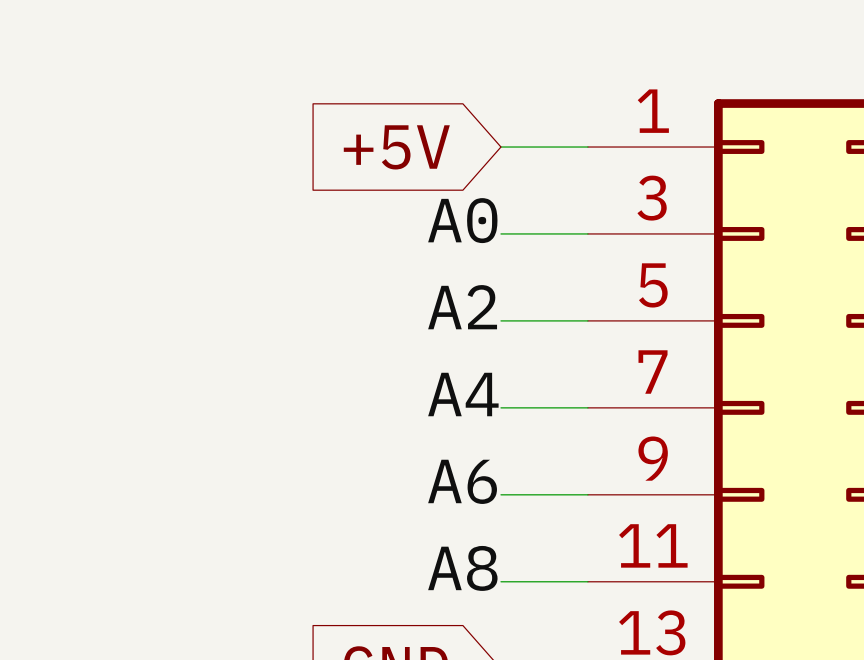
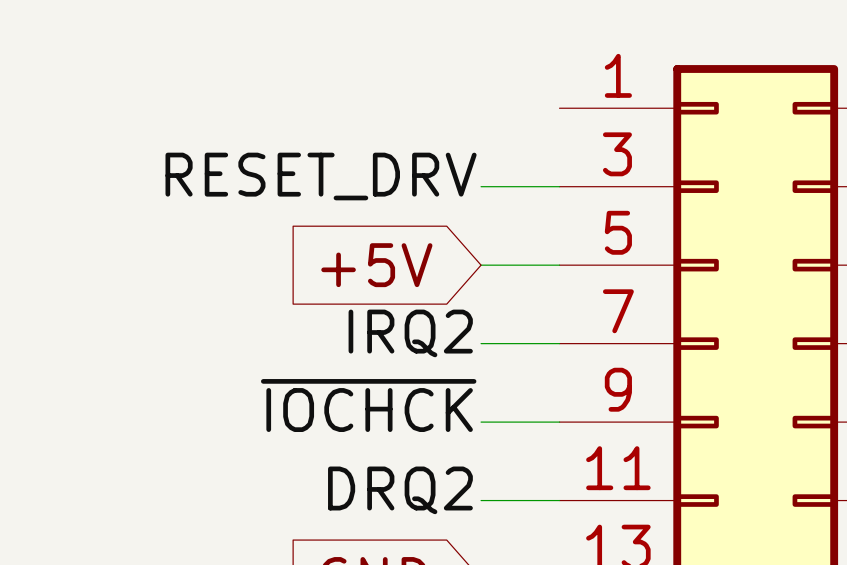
global label position: +5V (396, 147) -> +5V (376, 265)
wire: (500, 147) (587, 147) -> none
label: A0 (462, 220) -> RESET_DRV (321, 176)
label: A2 (462, 307) -> none
label: A4 (463, 394) -> IRQ2 (410, 333)
label: A6 (462, 481) -> ~{IOCHCK} (368, 405)
label: A8 (462, 568) -> DRQ2 (400, 490)

